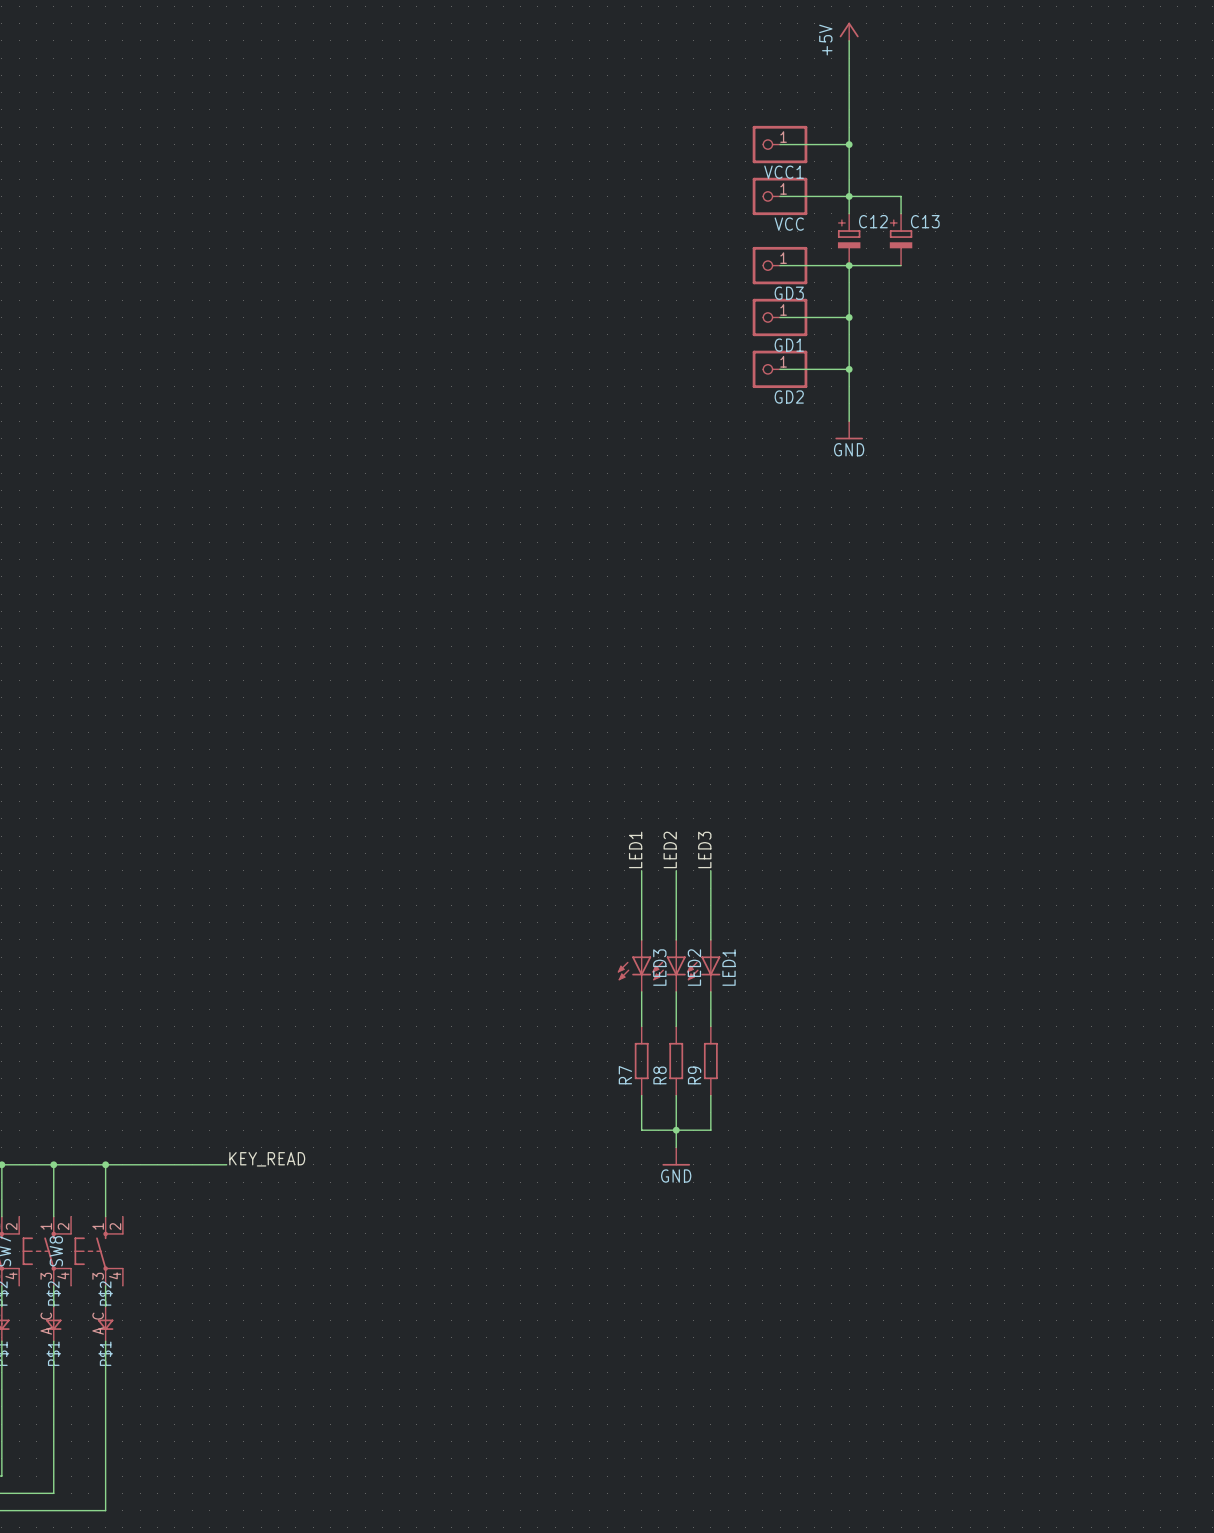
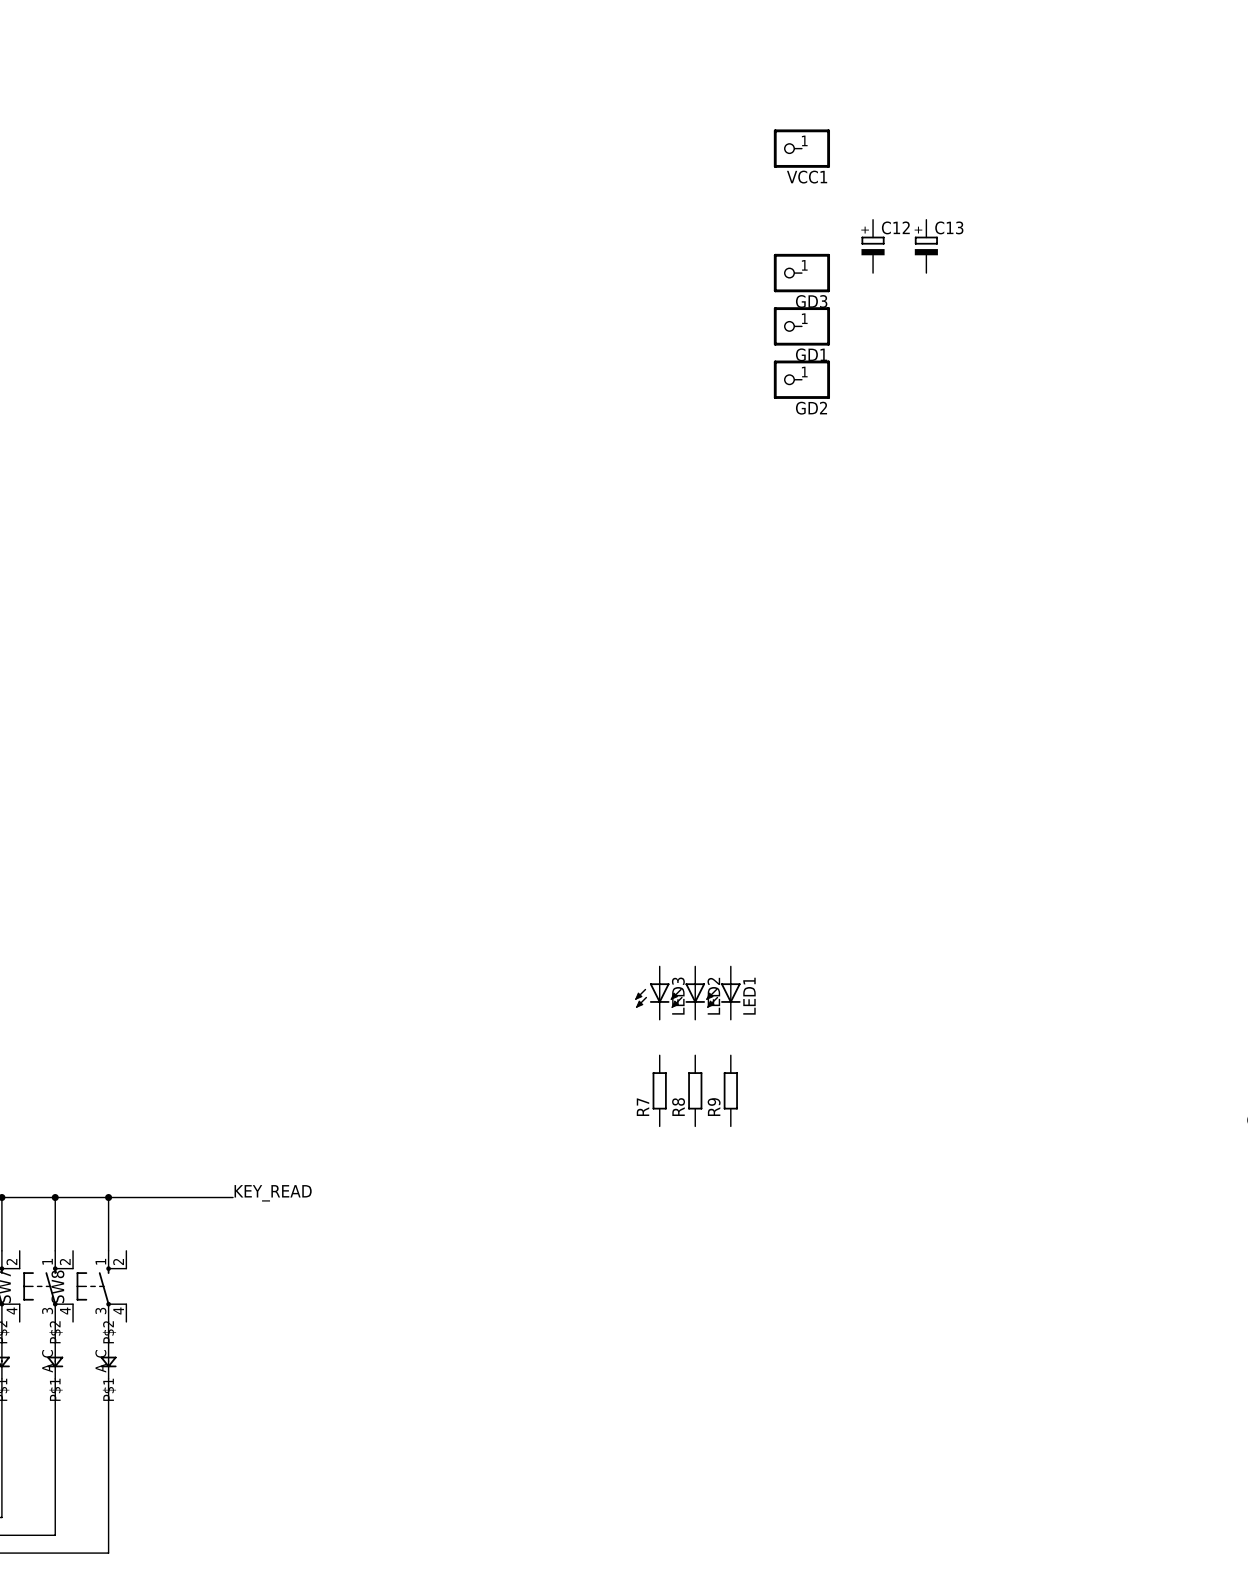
power symbol: +5V (849, 31) -> none
wire: (849, 40) (849, 213) -> none
wire: (780, 144) (849, 144) -> none
junction: (849, 144) -> none
wire: (780, 196) (901, 196) (901, 213) -> none
VCC: (780, 196) -> none
junction: (849, 196) -> none
wire: (780, 265) (901, 265) -> none
wire: (849, 265) (849, 421) -> none
junction: (849, 265) -> none
wire: (780, 317) (849, 317) -> none
junction: (849, 317) -> none
wire: (780, 369) (849, 369) -> none
junction: (849, 369) -> none
power symbol: GND (849, 430) -> none
label: LED1 (635, 849) -> none
label: LED2 (670, 849) -> none
label: LED3 (704, 849) -> none
wire: (641, 870) (641, 939) -> none
wire: (676, 870) (676, 939) -> none
wire: (710, 870) (710, 939) -> none
wire: (641, 991) (641, 1026) -> none
wire: (676, 991) (676, 1026) -> none
wire: (710, 991) (710, 1026) -> none
wire: (641, 1095) (641, 1130) (710, 1130) (710, 1095) -> none
wire: (676, 1095) (676, 1147) -> none
junction: (676, 1130) -> none
power symbol: GND (676, 1156) -> none

